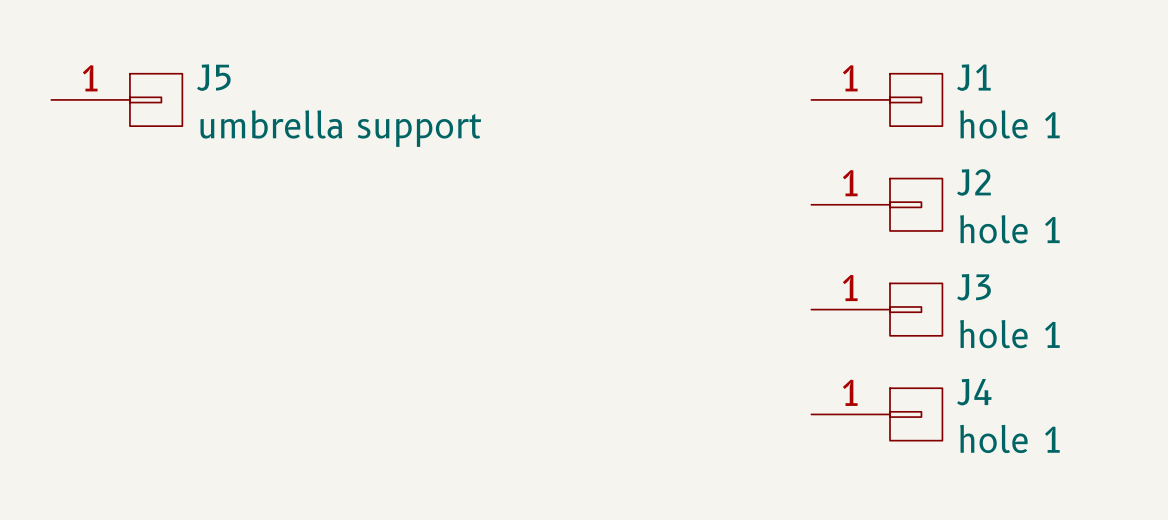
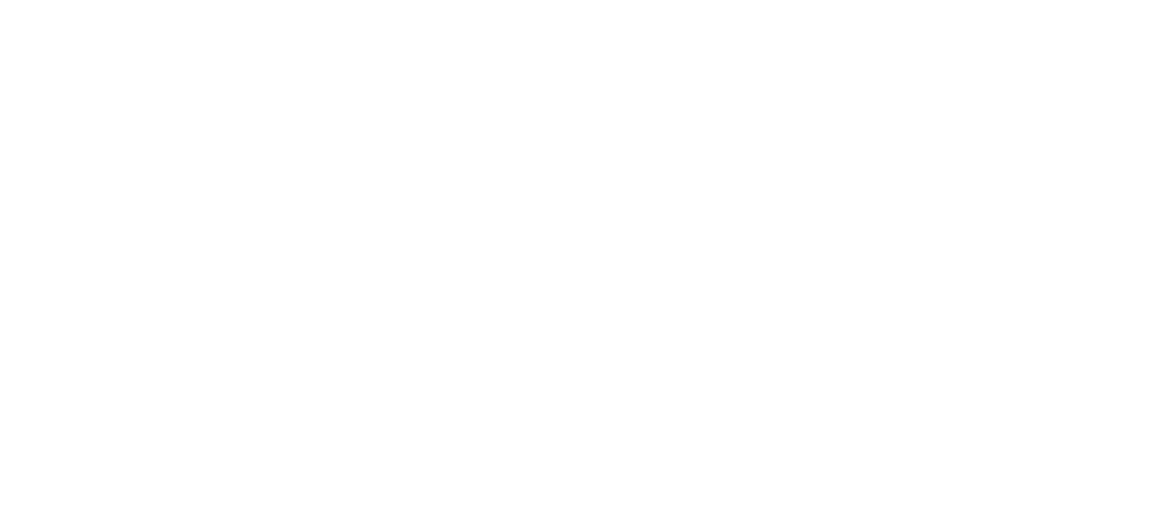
J5: umbrella support (116, 99) -> none
J1: hole 1 (876, 99) -> none
J2: hole 1 (876, 204) -> none
J3: hole 1 (876, 309) -> none
J4: hole 1 (876, 414) -> none

